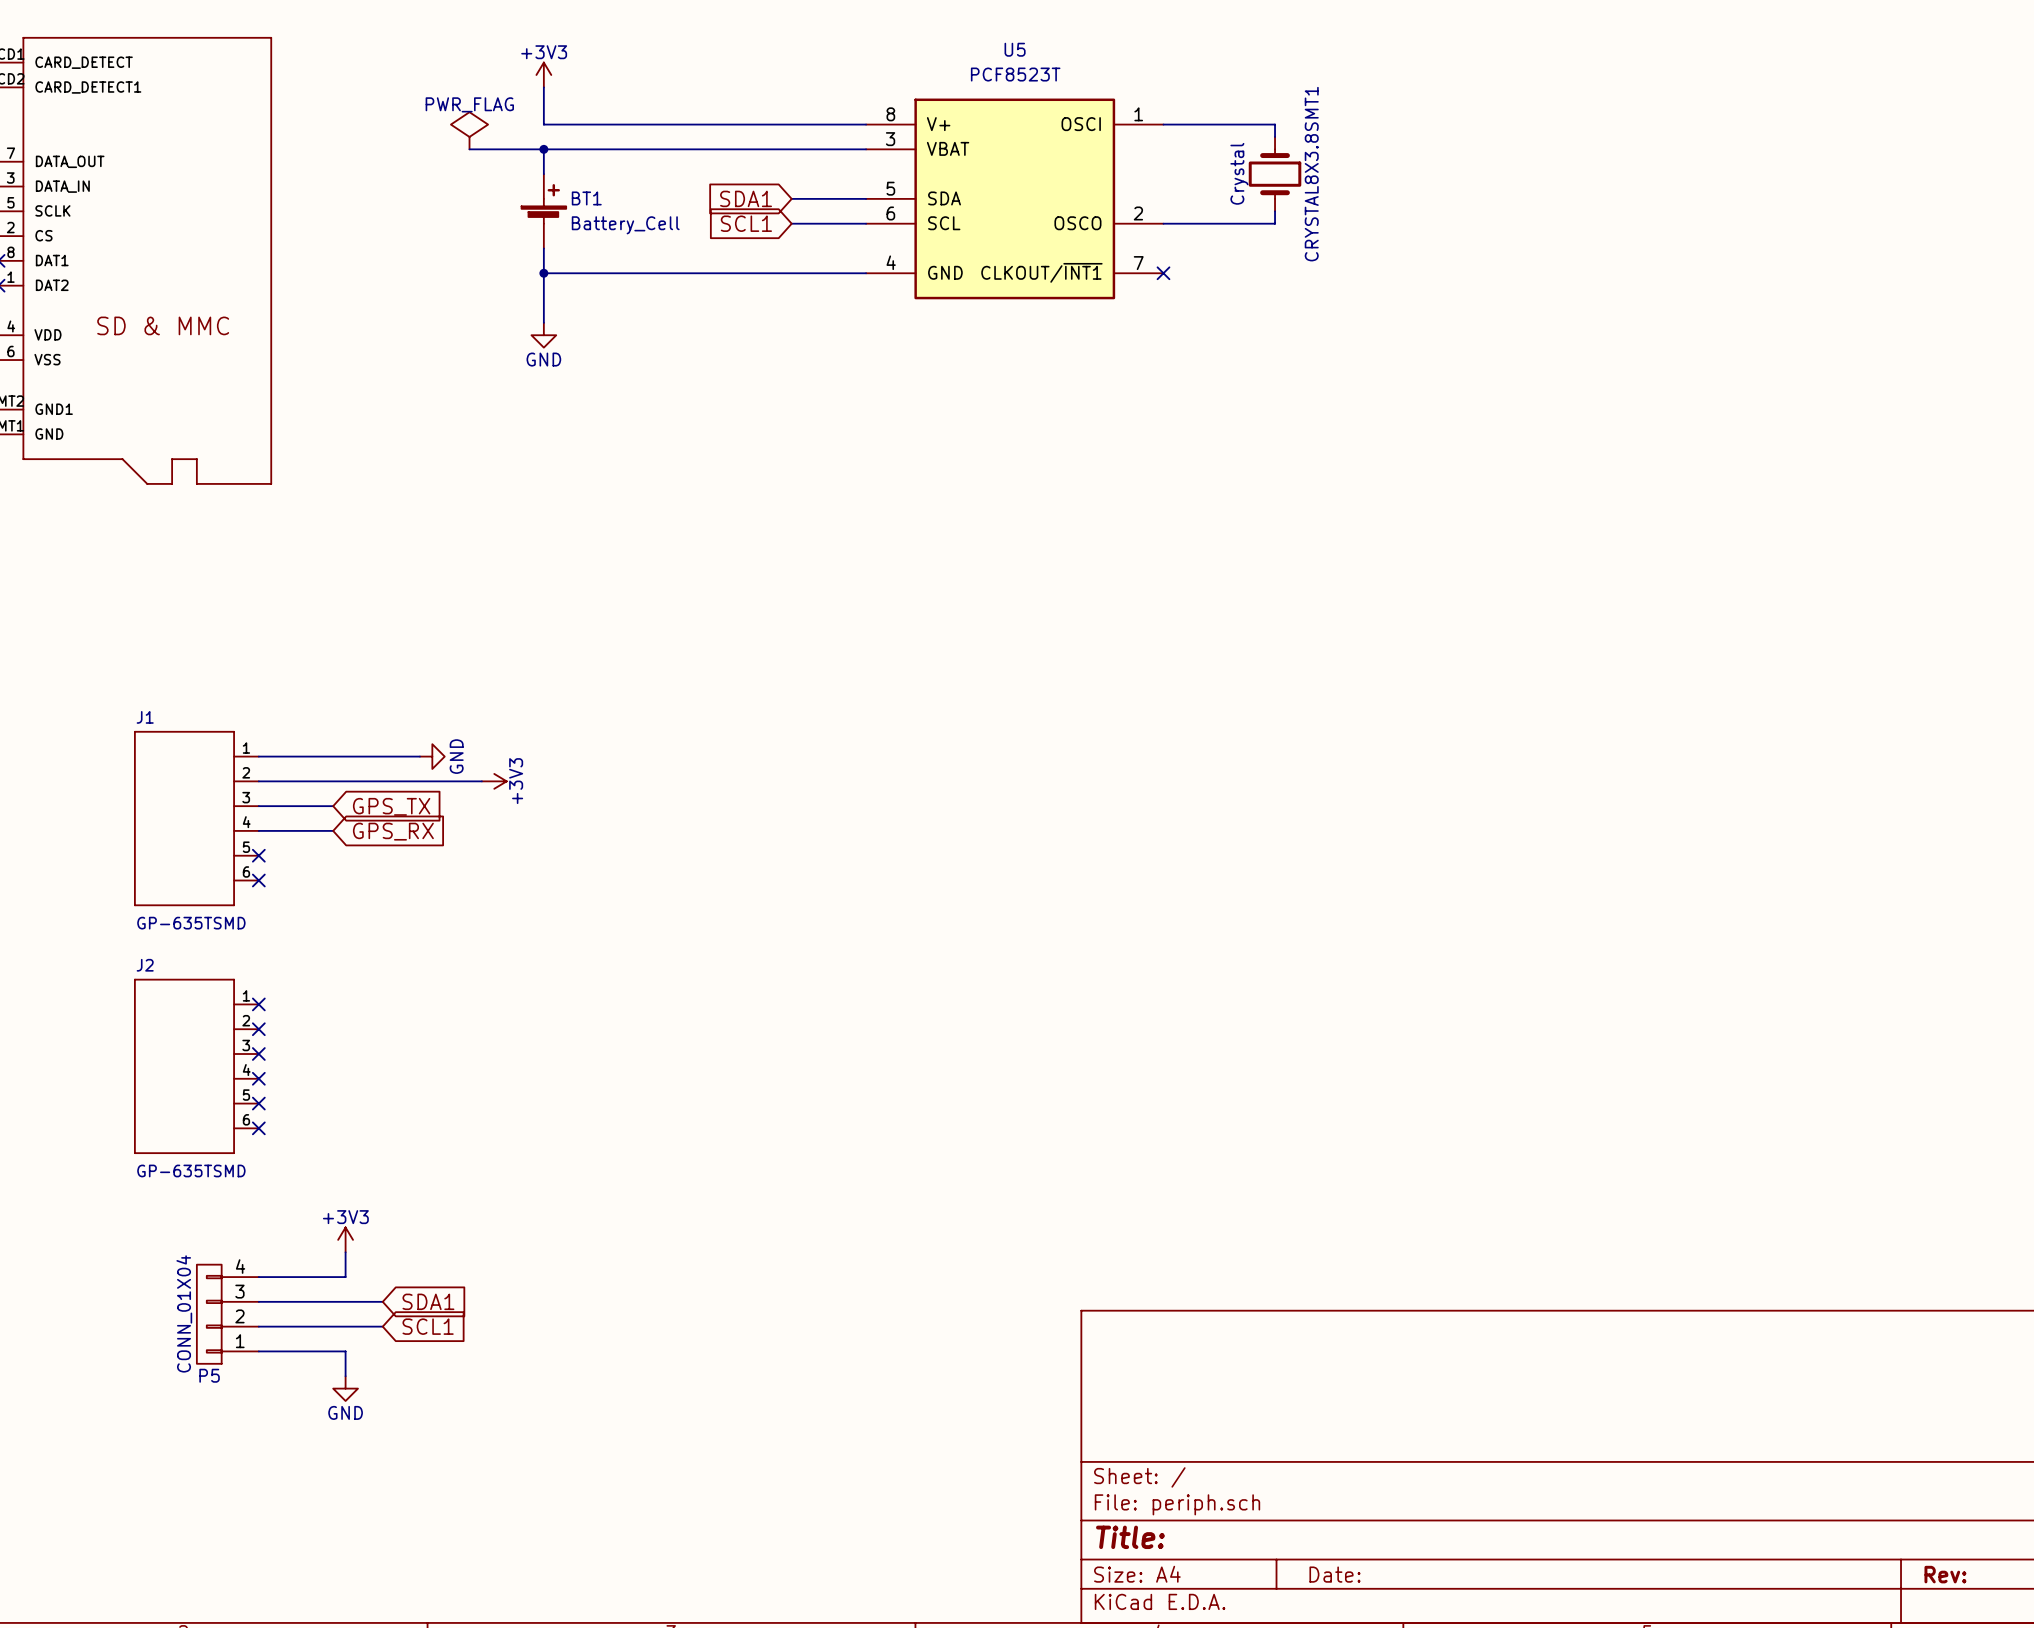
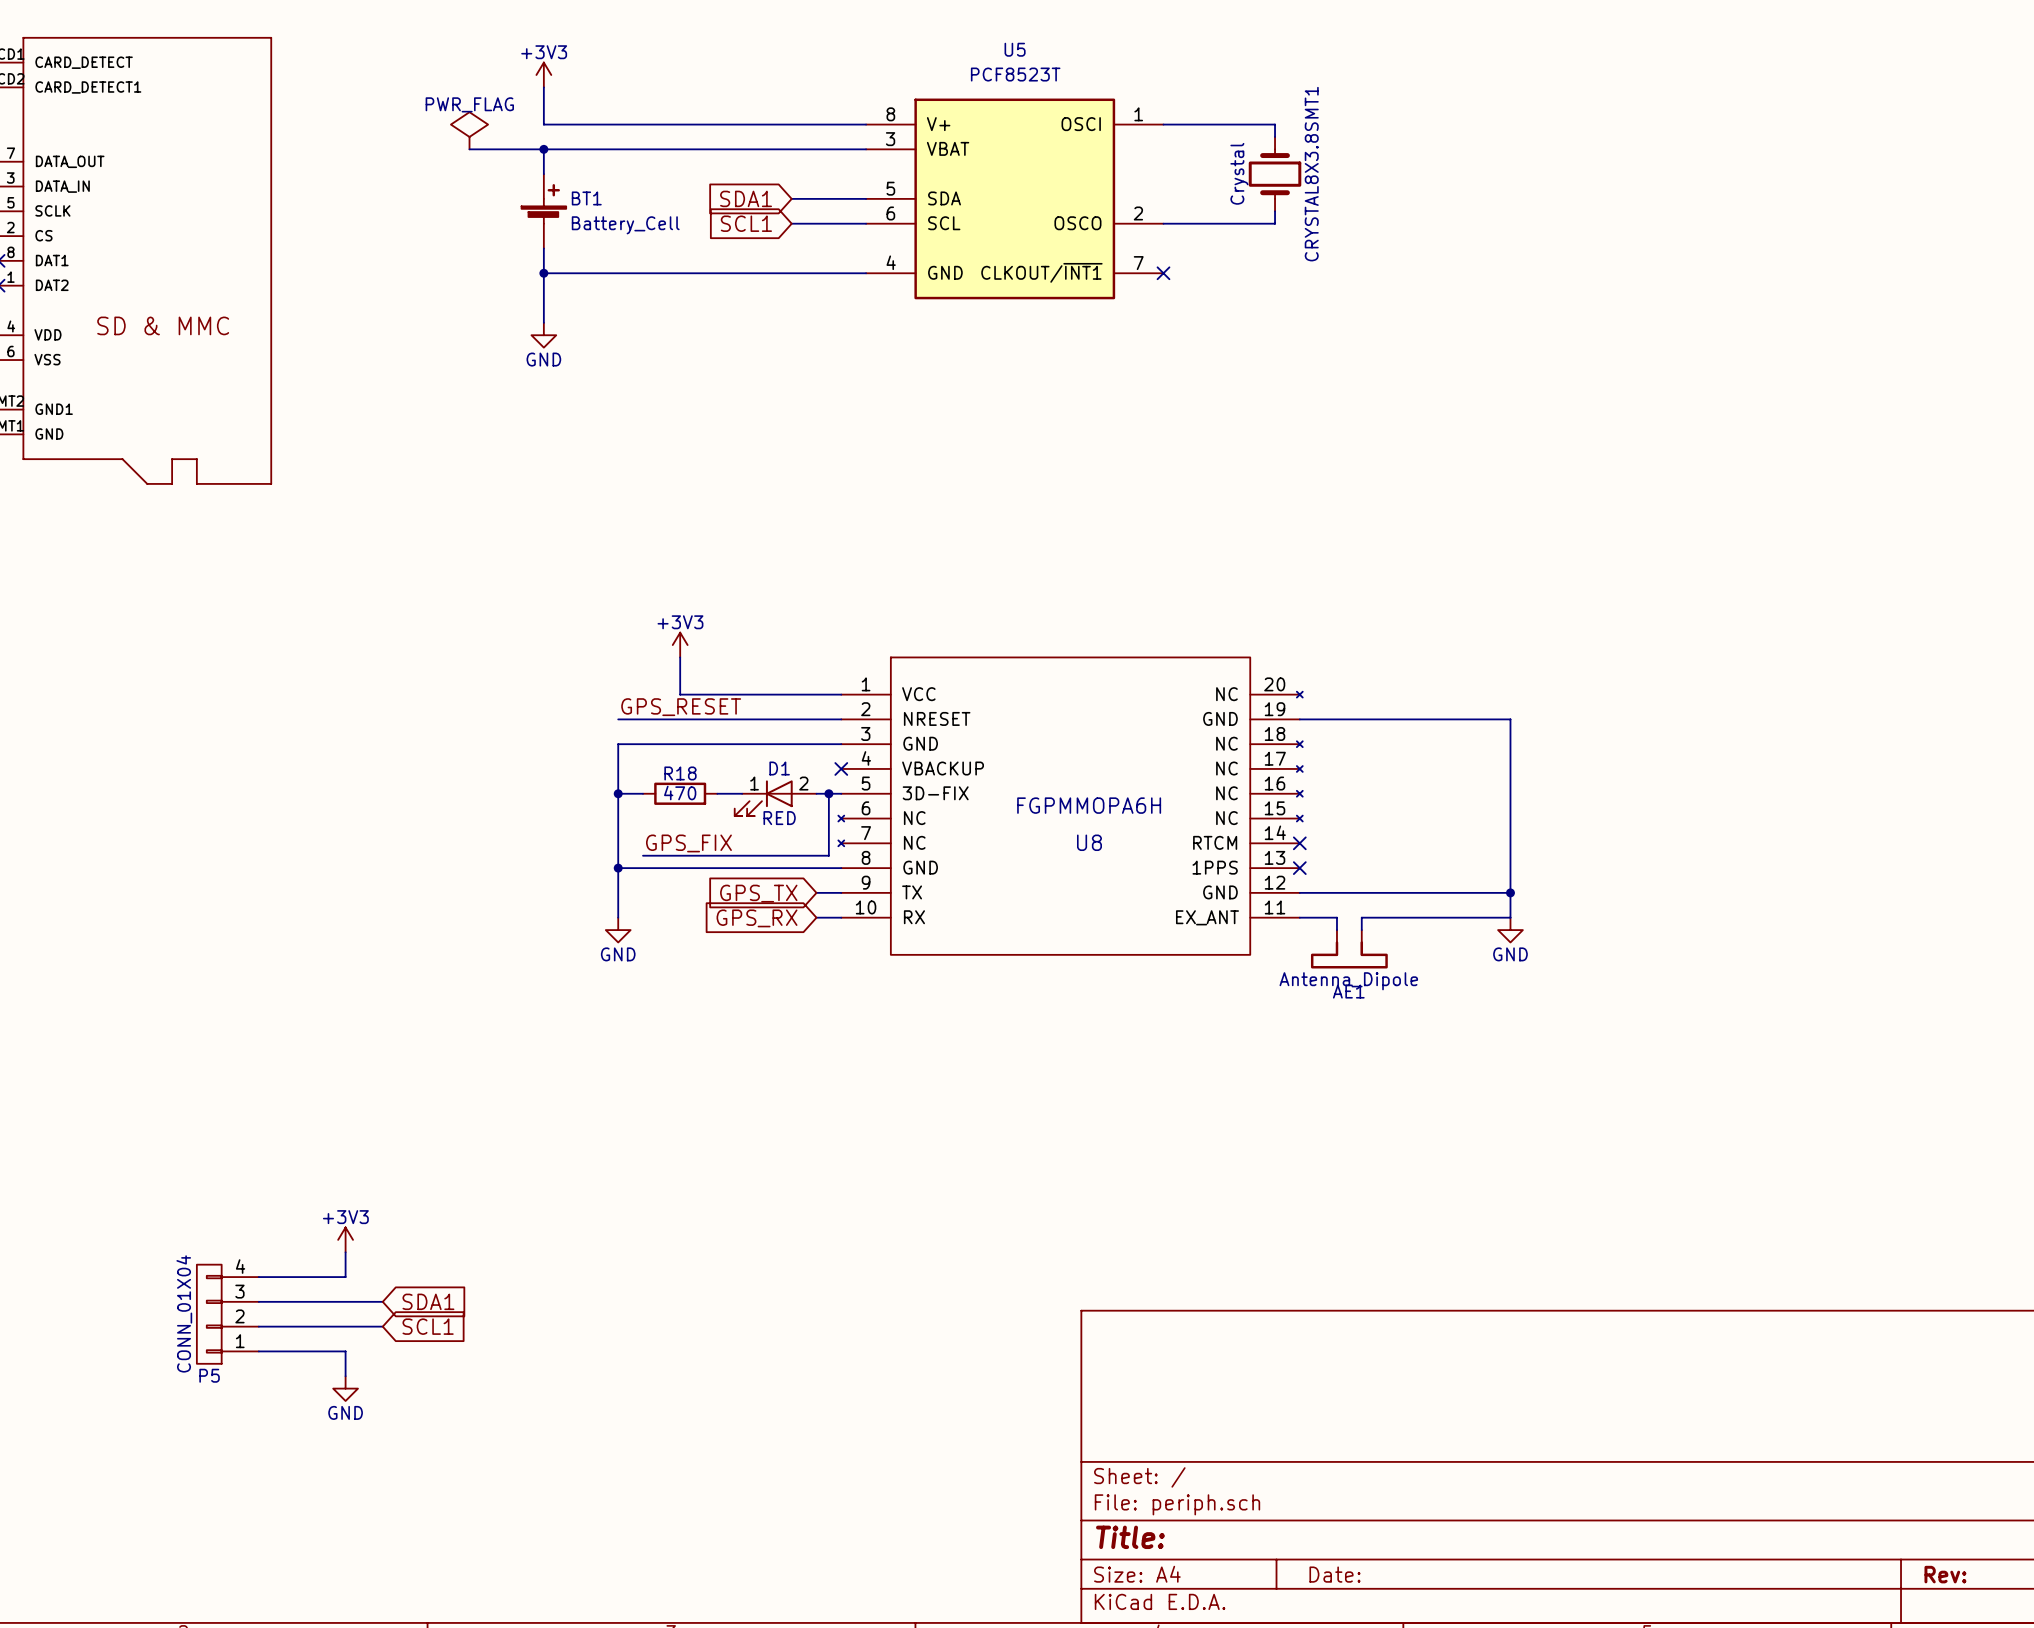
wire: none -> (680, 657) (680, 694) (841, 694)
label: none -> GPS_RESET (681, 707)
wire: none -> (618, 719) (841, 719)
wire: none -> (1299, 719) (1510, 719) (1510, 917) (1361, 917) (1361, 930)
wire: none -> (841, 744) (618, 744) (618, 917)
wire: (258, 756) (419, 756) -> none
power symbol: GND (432, 756) -> none
no-connect mark: none -> (841, 768)
wire: (258, 781) (481, 781) -> none
power symbol rotation: 0° (494, 781) -> 90° counterclockwise (680, 645)
power symbol position: +3V3 (494, 781) -> +3V3 (680, 645)
wire: none -> (618, 793) (643, 793)
junction: none -> (618, 793)
R18: none -> 470 (680, 793)
wire: none -> (717, 793) (742, 793)
wire: none -> (816, 793) (841, 793)
wire: none -> (828, 793) (828, 855) (643, 855)
junction: none -> (828, 793)
D1: none -> RED (775, 798)
wire: (258, 806) (333, 806) -> none
global label: GPS_TX (391, 806) -> none
U8: none -> FGPMMOPA6H (1070, 806)
J1: GP-635TSMD (196, 818) -> none
wire: (258, 830) (333, 830) -> none
global label: GPS_RX (393, 831) -> none
label: none -> GPS_FIX (688, 843)
no-connect mark: none -> (1299, 843)
no-connect mark: (258, 855) -> none
wire: none -> (618, 868) (841, 868)
junction: none -> (618, 868)
no-connect mark: none -> (1299, 868)
no-connect mark: (258, 880) -> none
wire: none -> (816, 892) (841, 892)
wire: none -> (1299, 892) (1510, 892)
junction: none -> (1510, 892)
global label: none -> GPS_TX (758, 893)
wire: none -> (816, 917) (841, 917)
wire: none -> (1299, 917) (1336, 917) (1336, 930)
global label: none -> GPS_RX (757, 918)
power symbol: none -> GND (618, 930)
power symbol: none -> GND (1510, 930)
AE1: none -> Antenna_Dipole (1349, 949)
no-connect mark: (258, 1004) -> none
no-connect mark: (258, 1029) -> none
no-connect mark: (258, 1054) -> none
J2: GP-635TSMD (196, 1066) -> none
no-connect mark: (258, 1078) -> none
no-connect mark: (258, 1103) -> none
no-connect mark: (258, 1128) -> none

